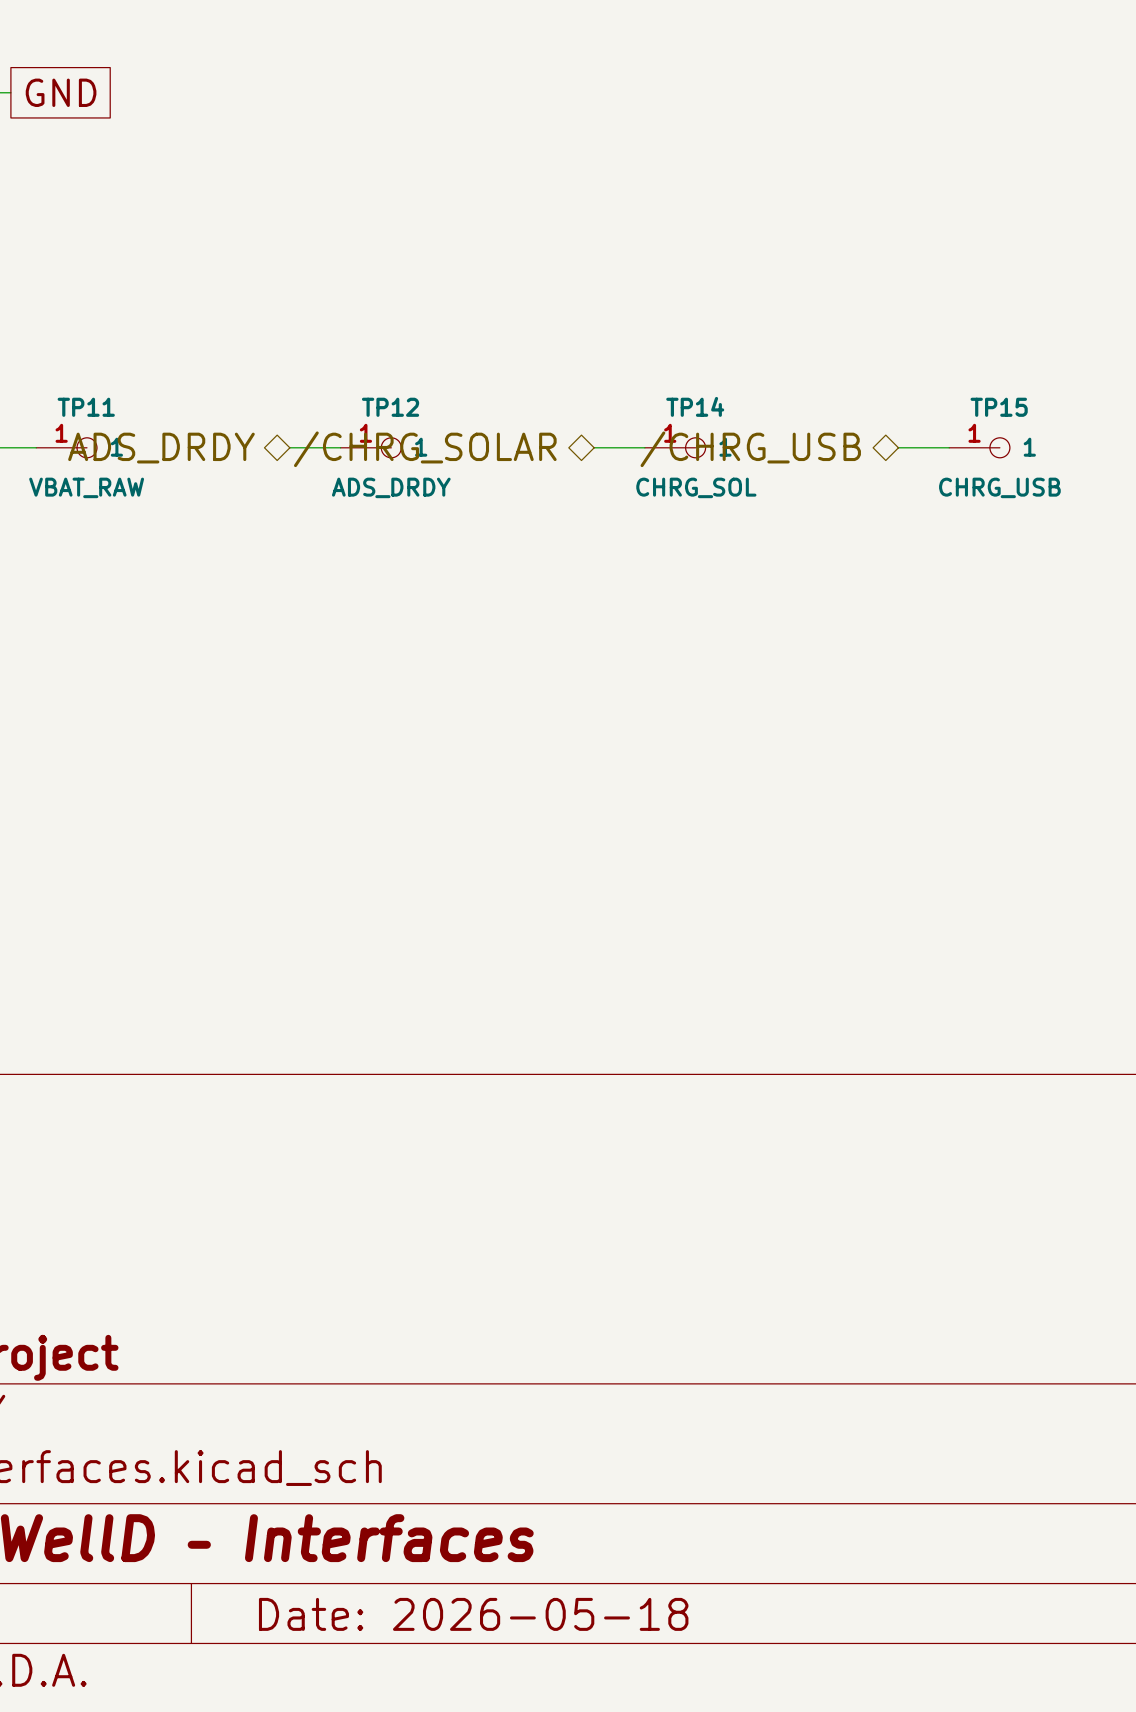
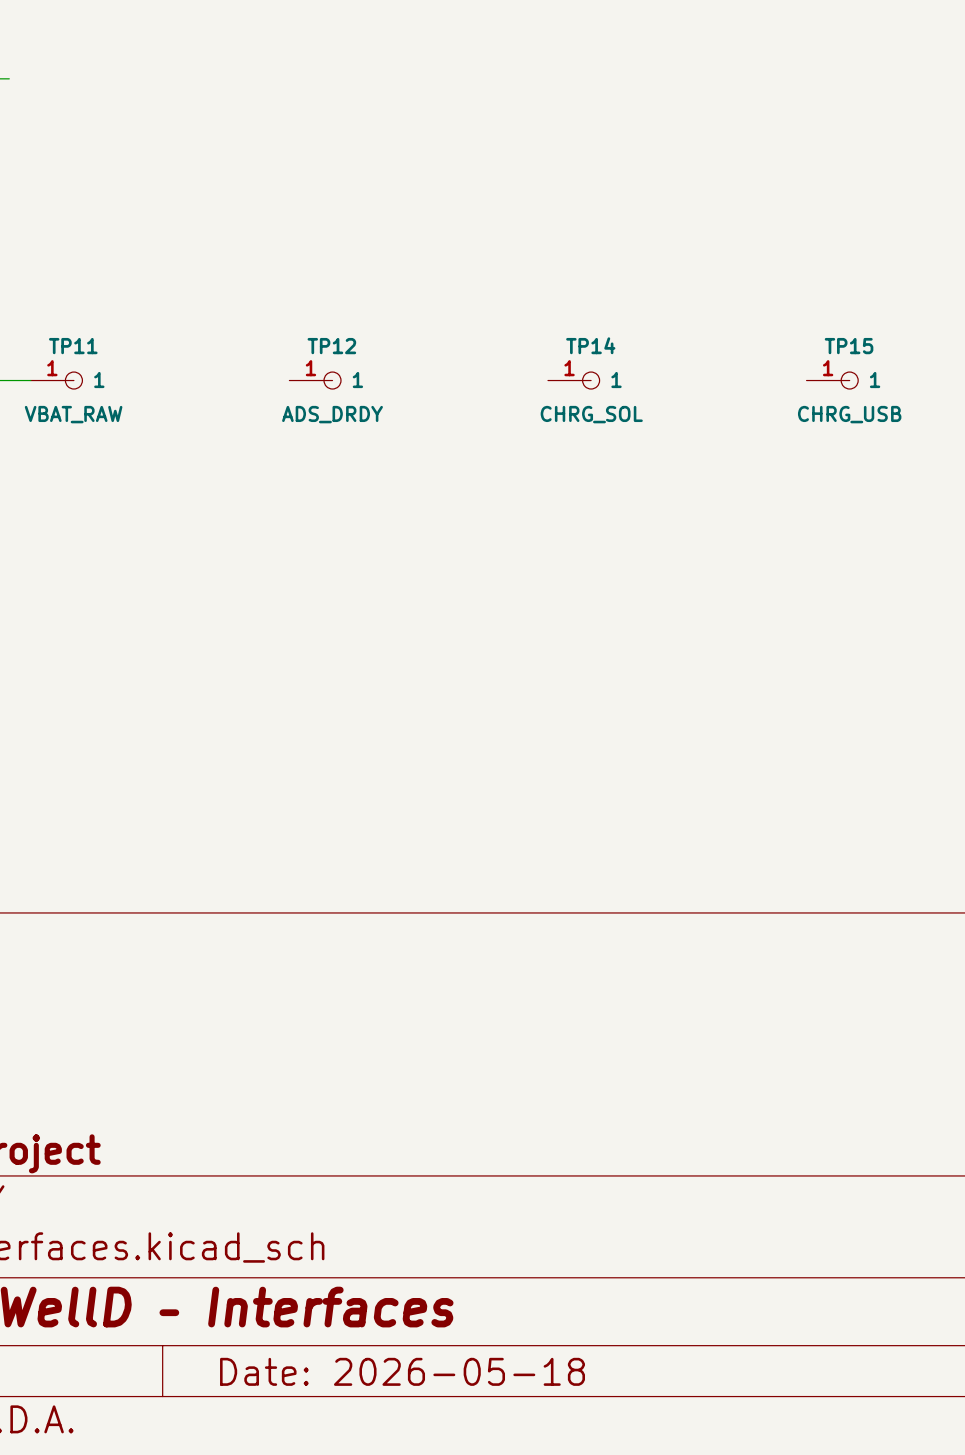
global label: GND (61, 92) -> none
wire: (289, 447) (340, 447) -> none
wire: (594, 447) (644, 447) -> none
wire: (898, 447) (949, 447) -> none
hierarchical label: ADS_DRDY (161, 448) -> none
hierarchical label: /CHRG_SOLAR (425, 449) -> none
hierarchical label: /CHRG_USB (750, 449) -> none

